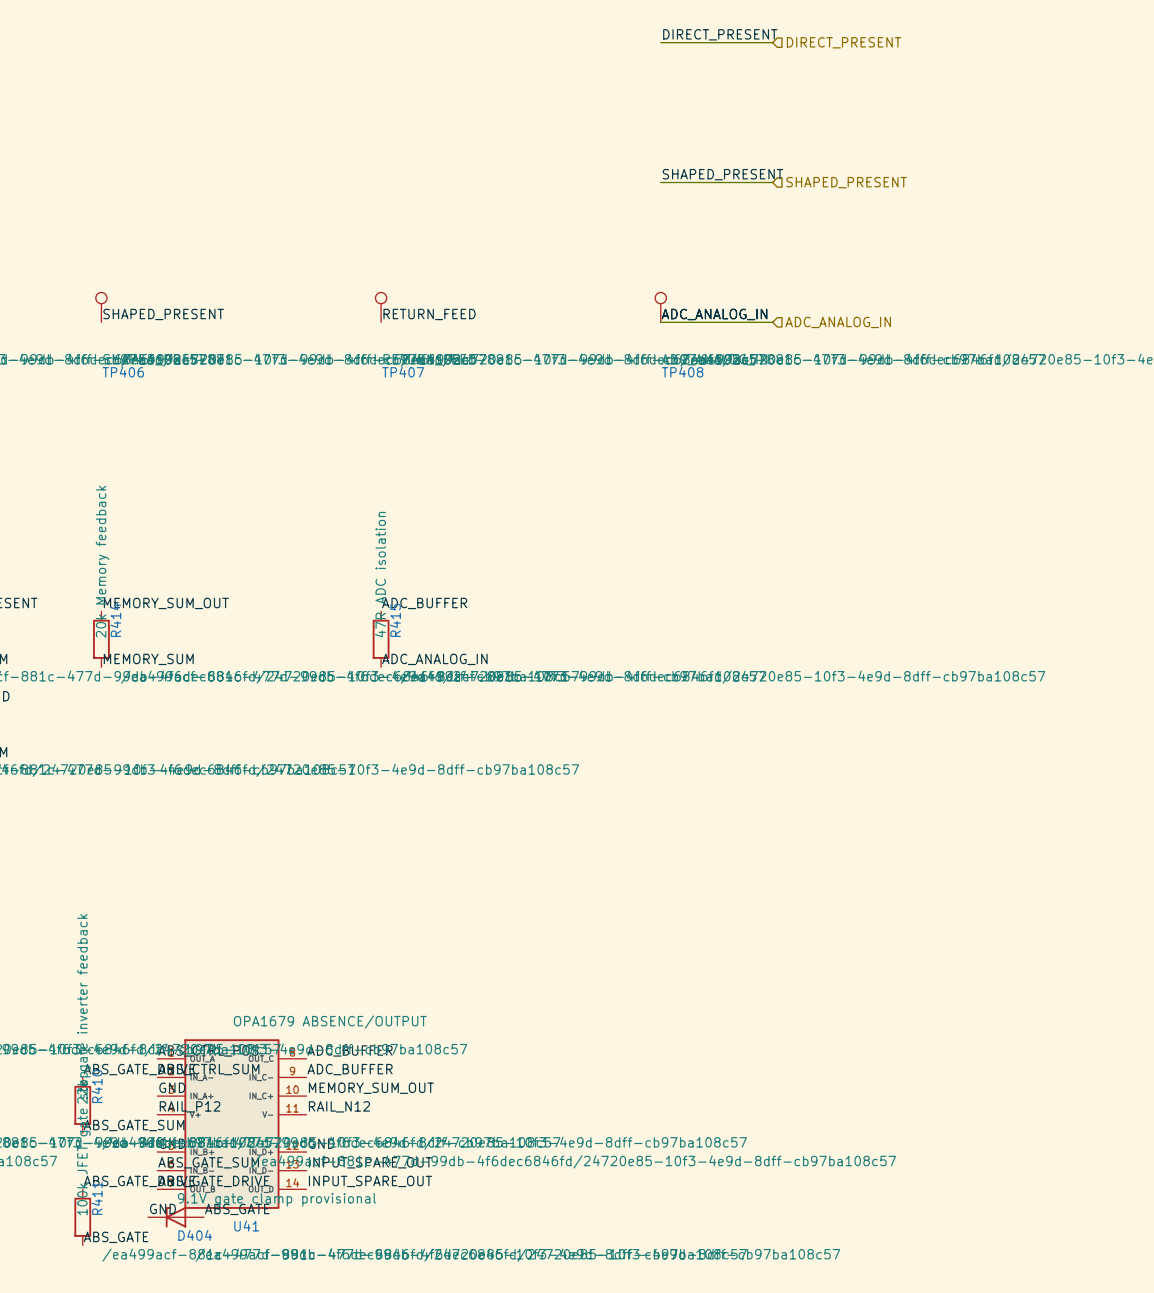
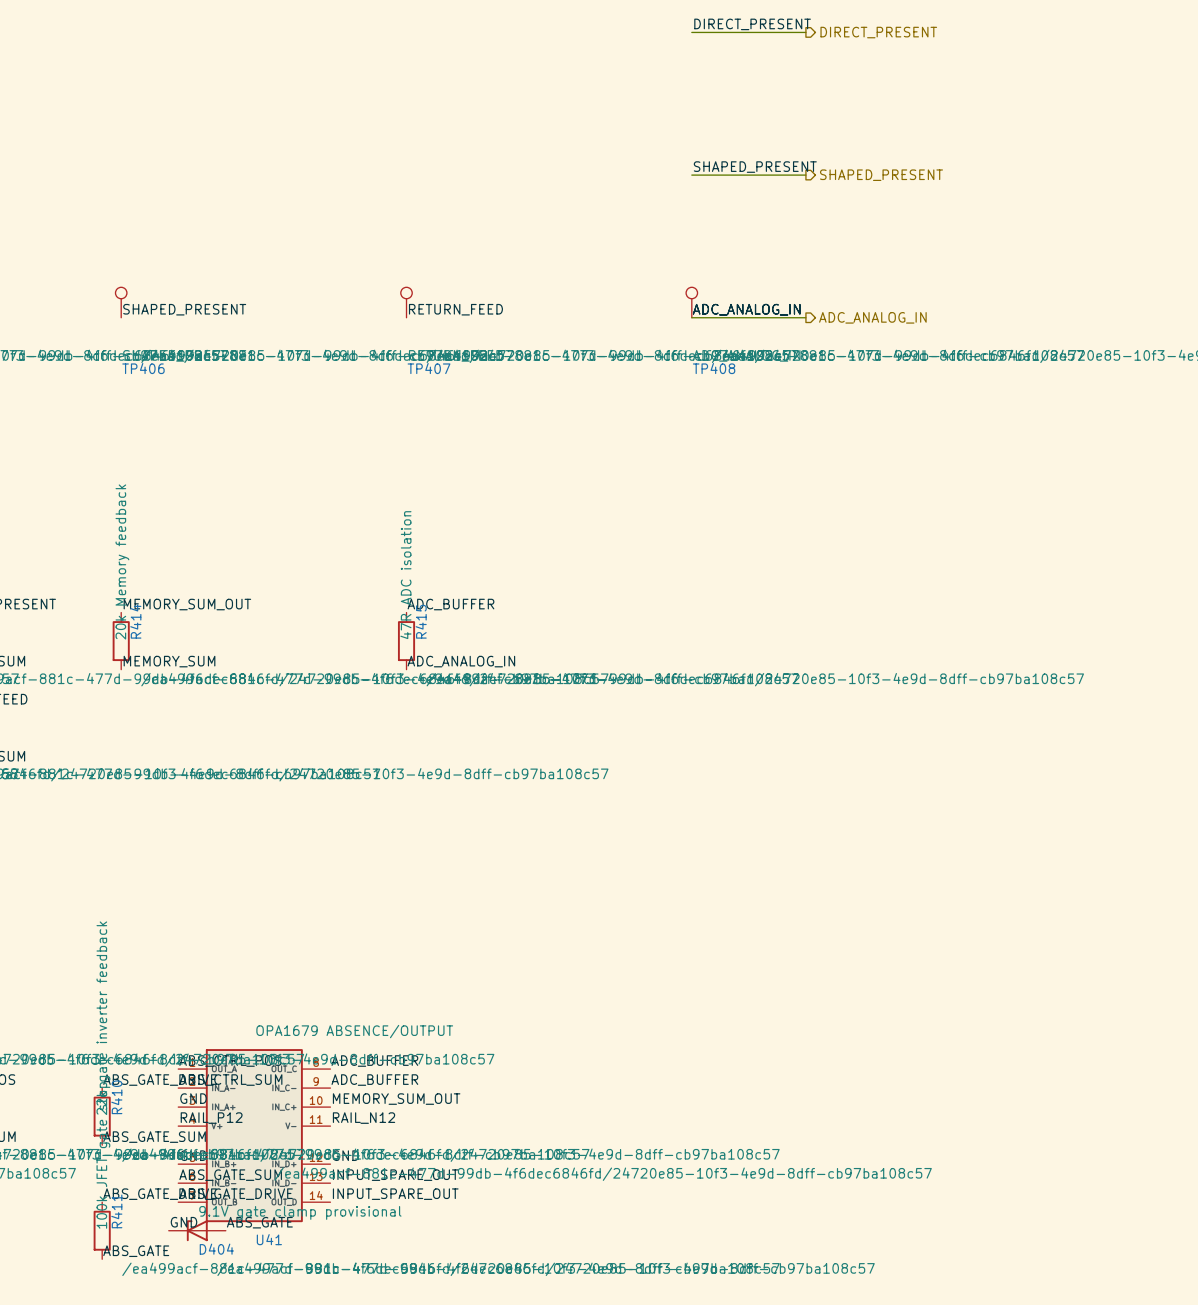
hierarchical label shape: input (844, 42) -> output (878, 32)
hierarchical label shape: input (846, 182) -> output (881, 175)
hierarchical label shape: input (838, 322) -> output (872, 317)

